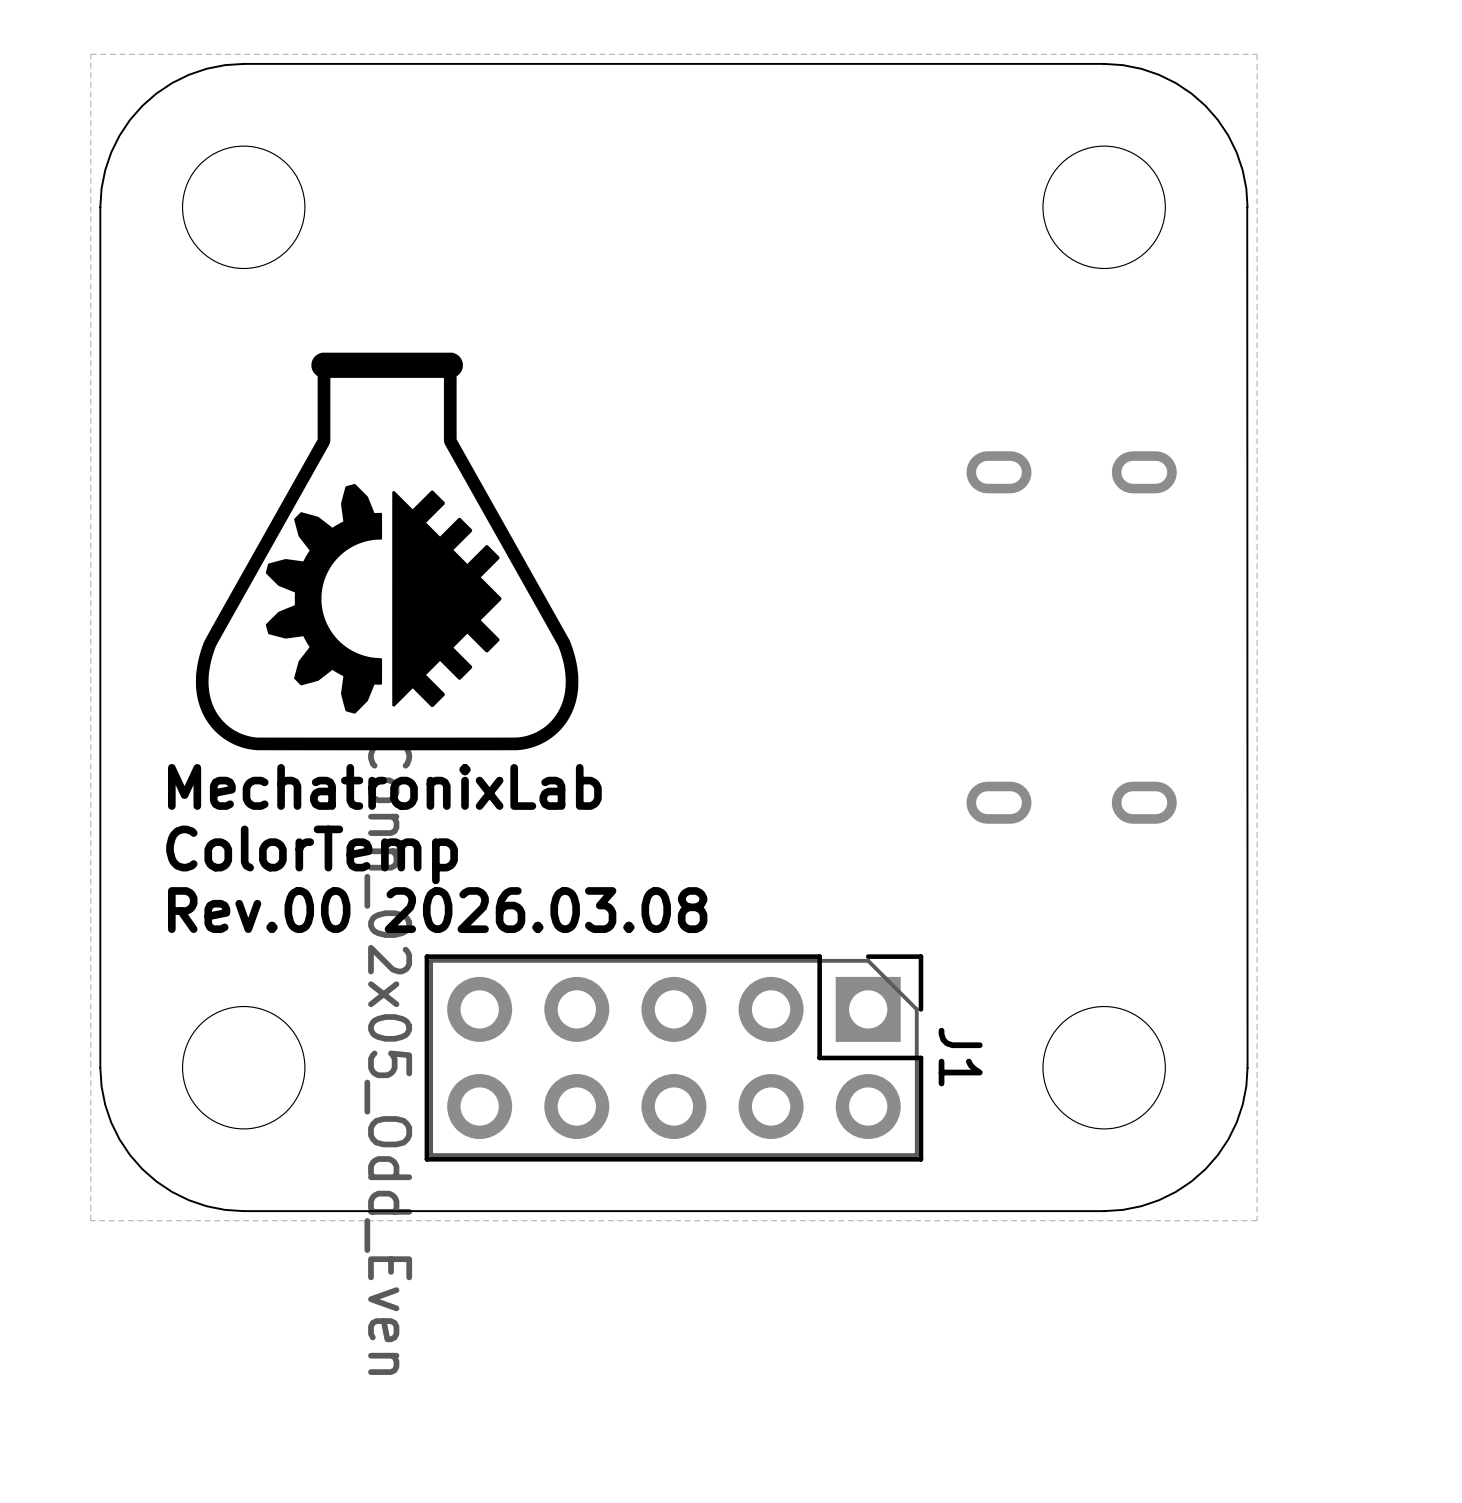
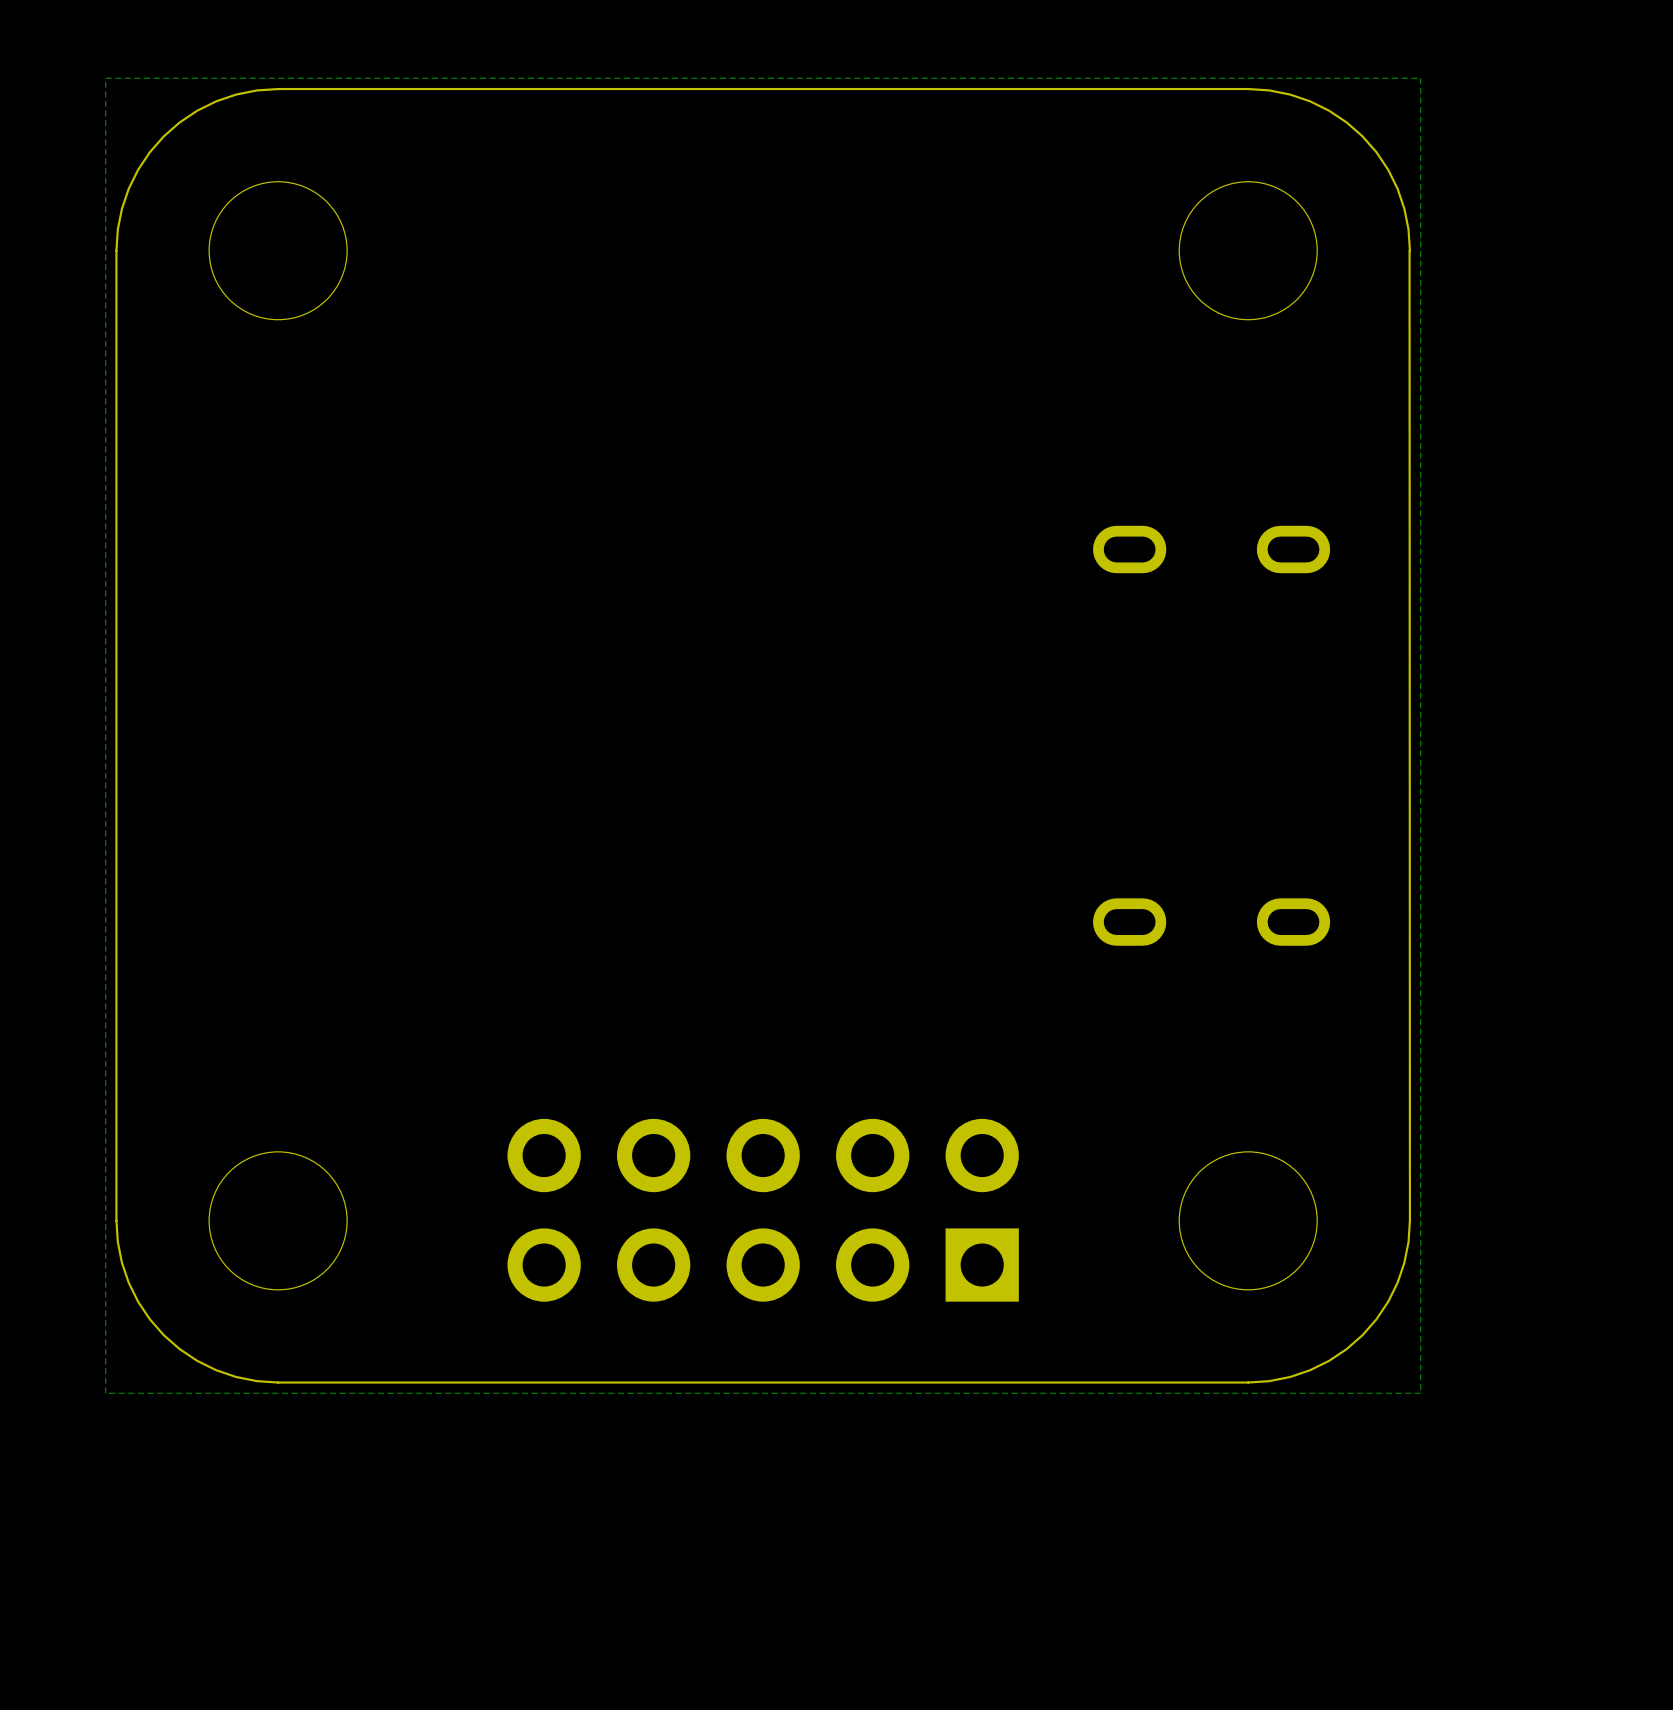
drawing: [195, 352, 579, 751] -> none
text: MechatronixLab (384, 786) -> none
text: ColorTemp (312, 854) -> none
text: Rev.00 2026.03.08 (437, 910) -> none
J1 side: bottom (673, 1057) -> top (763, 1210)

